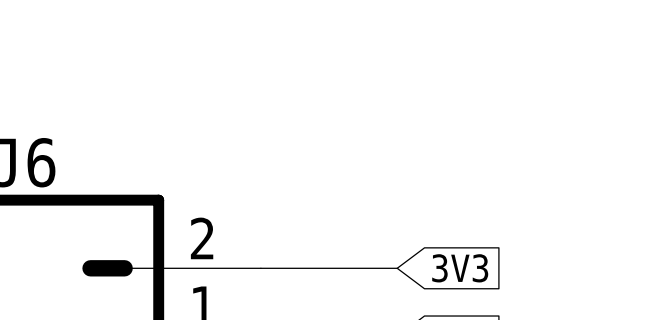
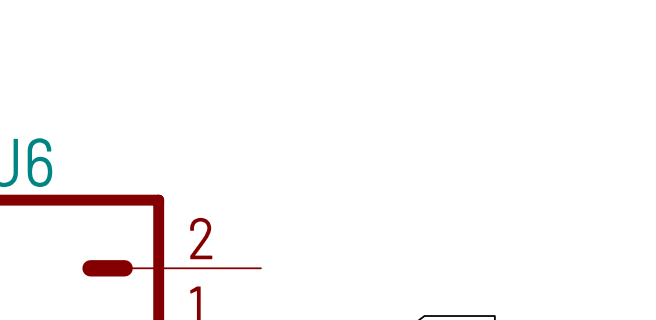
wire: (260, 268) (397, 268) -> none
global label: 3V3 (460, 268) -> none

